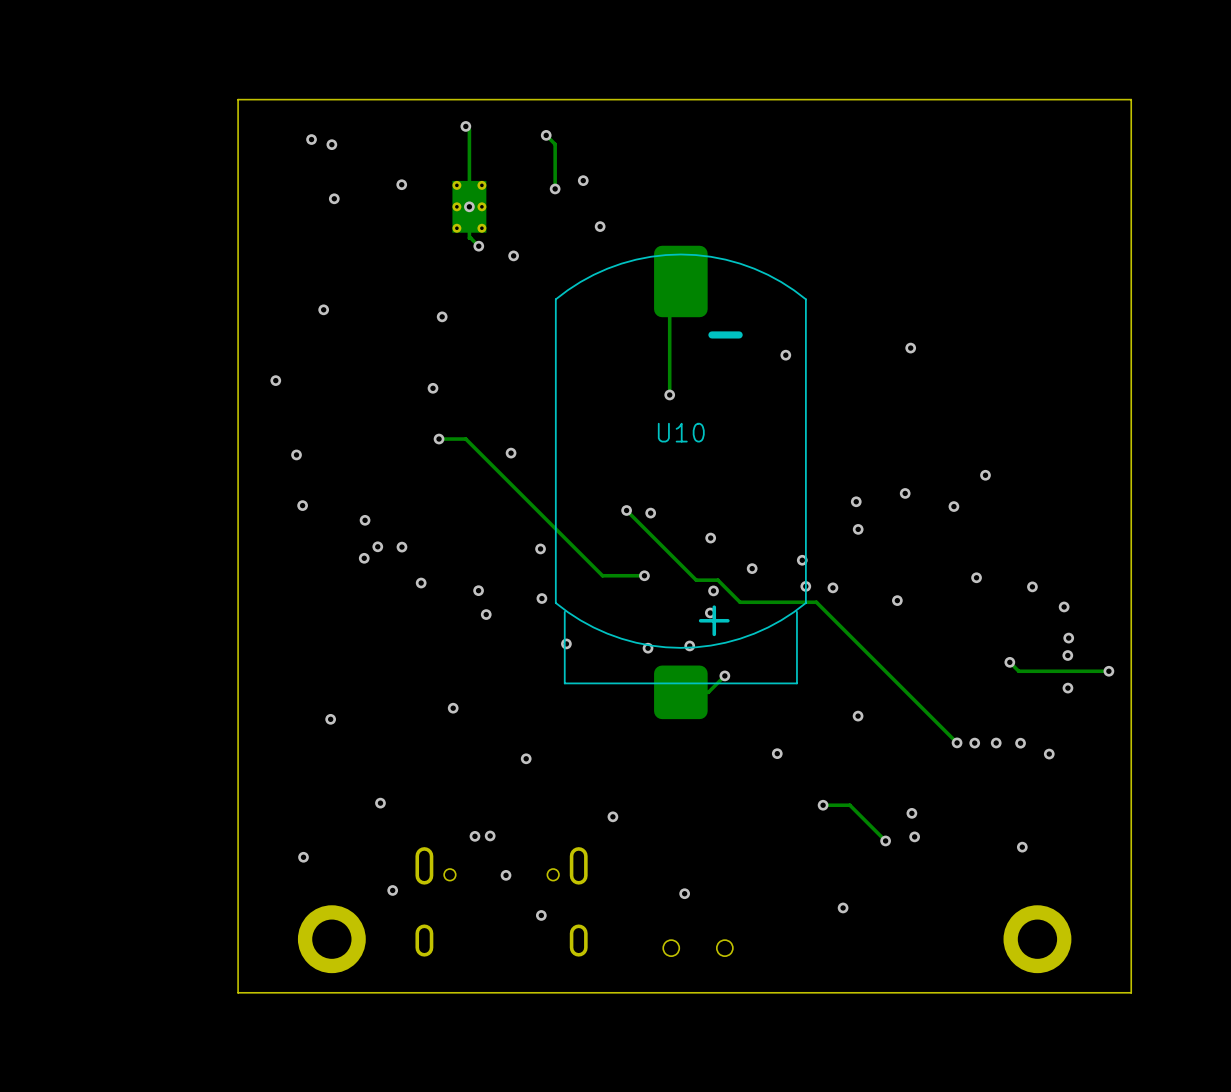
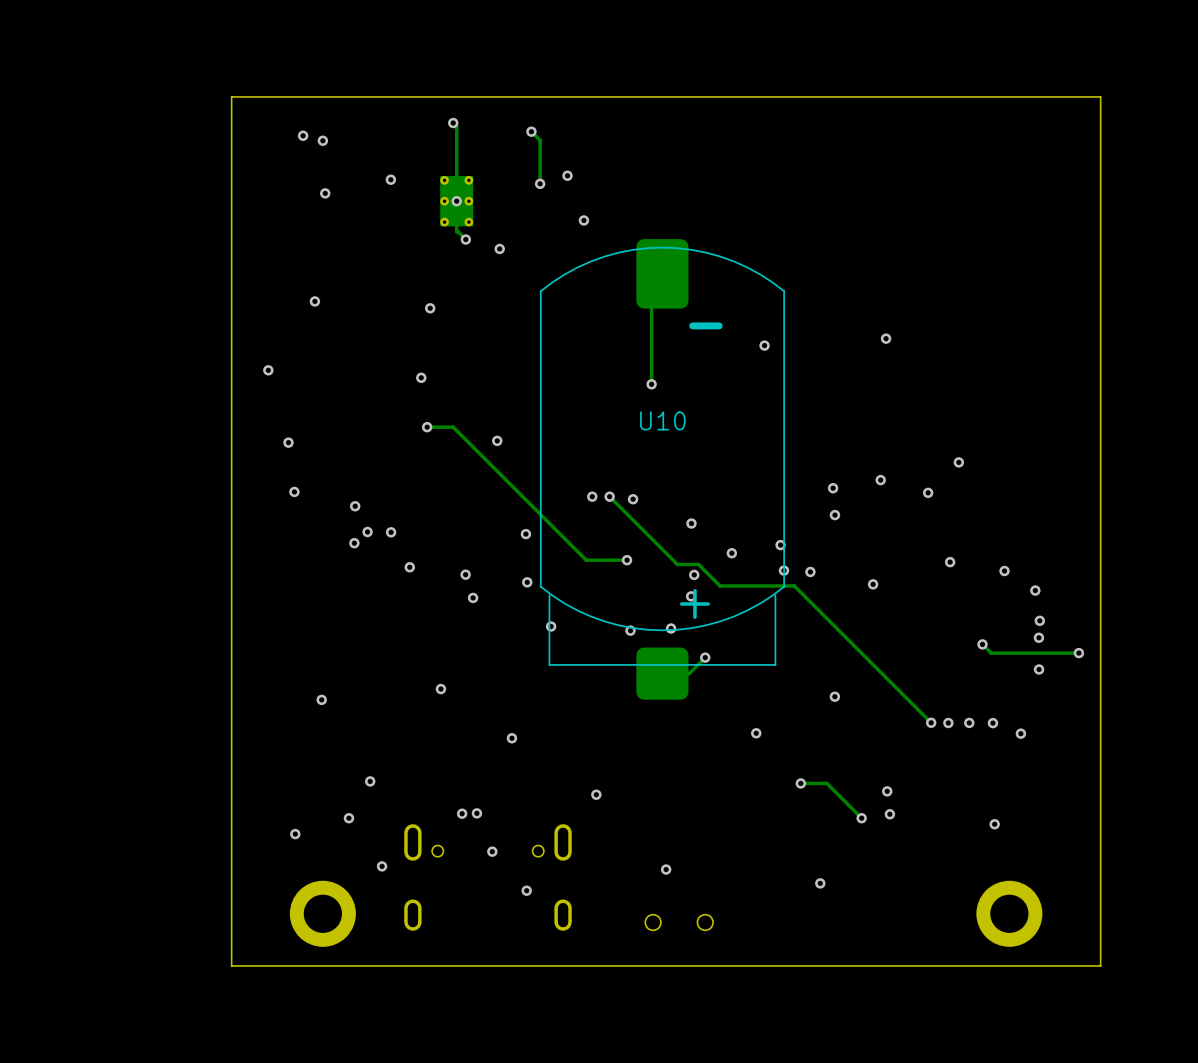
via: none -> (592, 496)
via: none -> (348, 818)

